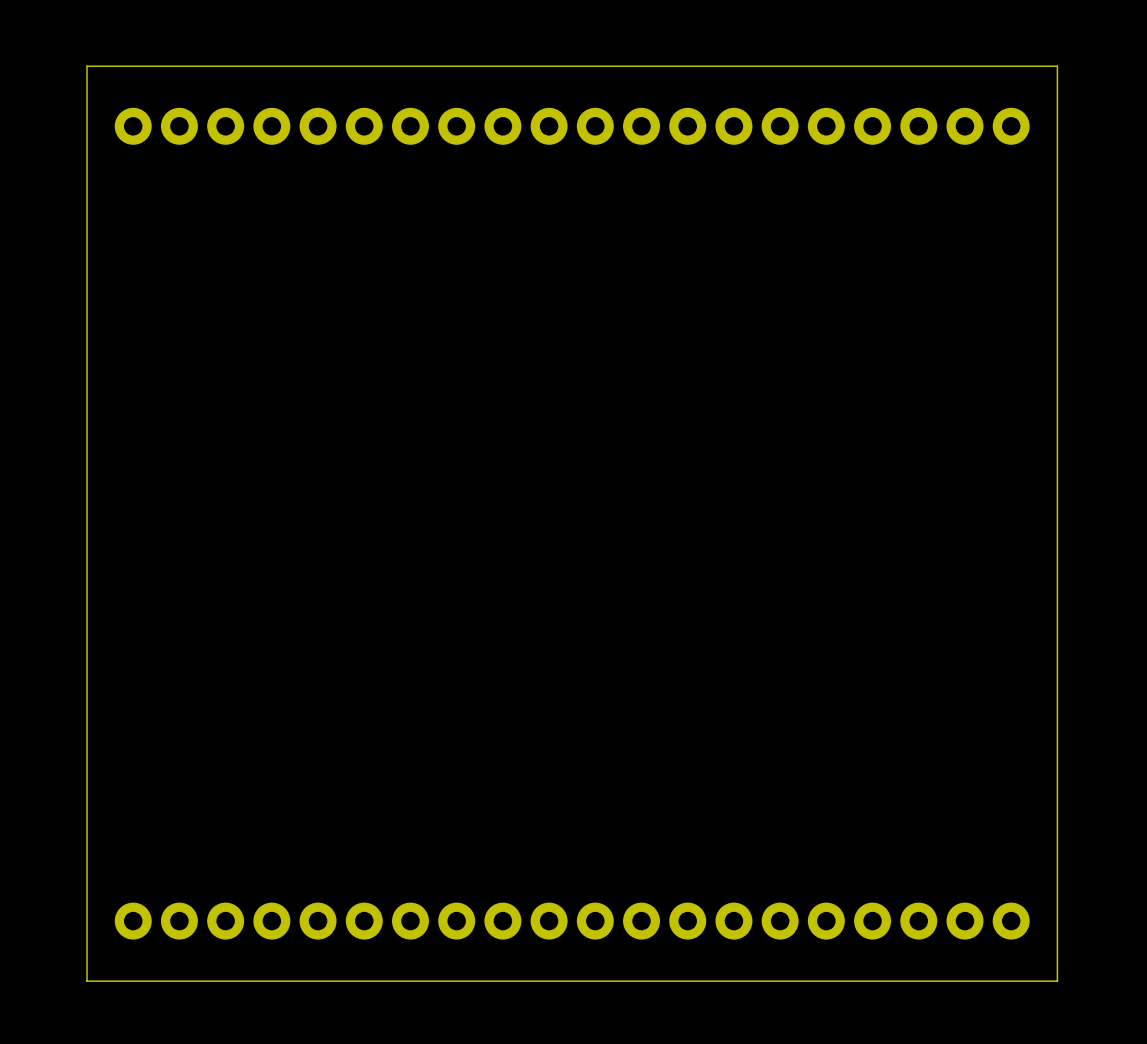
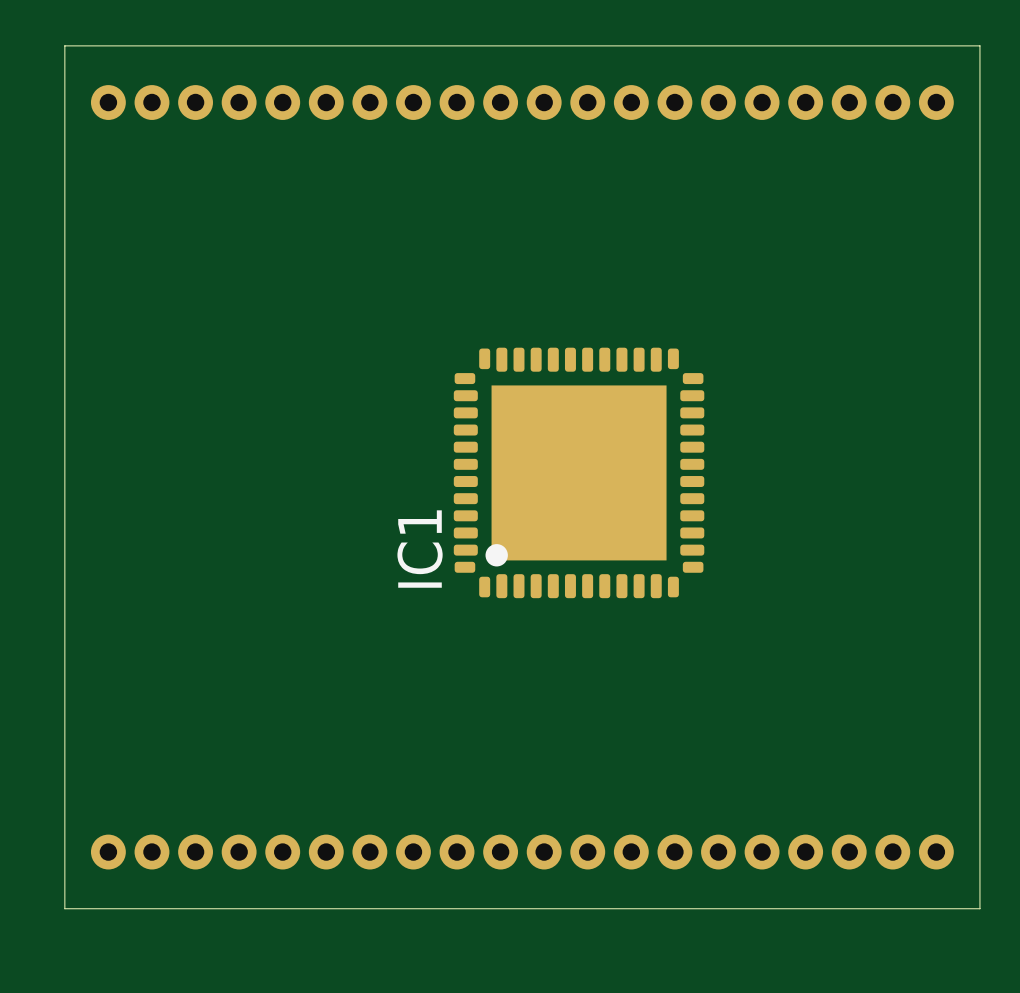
IC1: none -> (579, 472)

